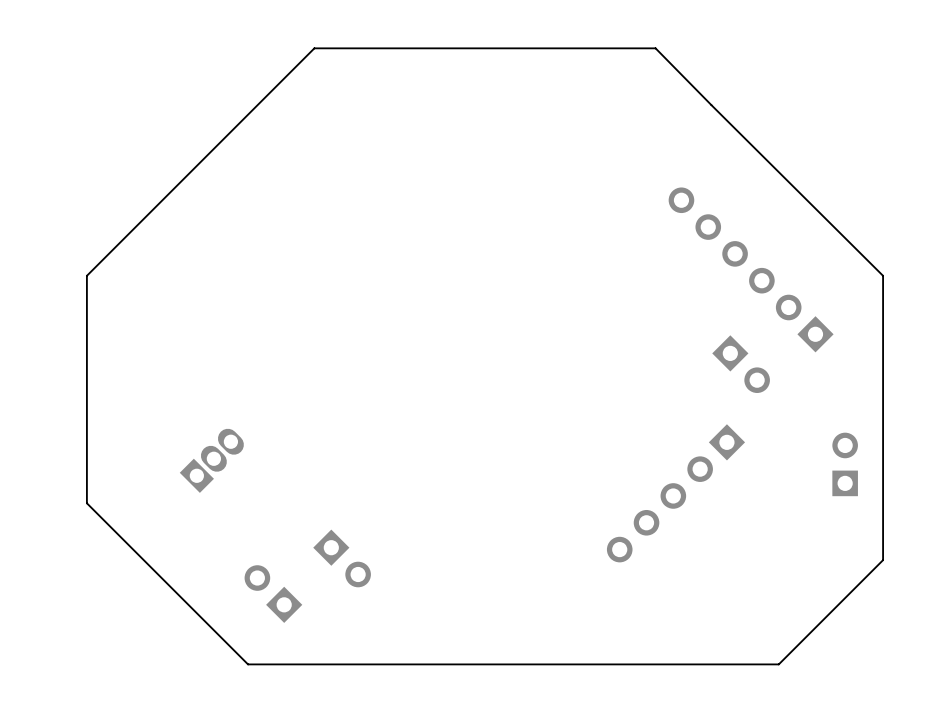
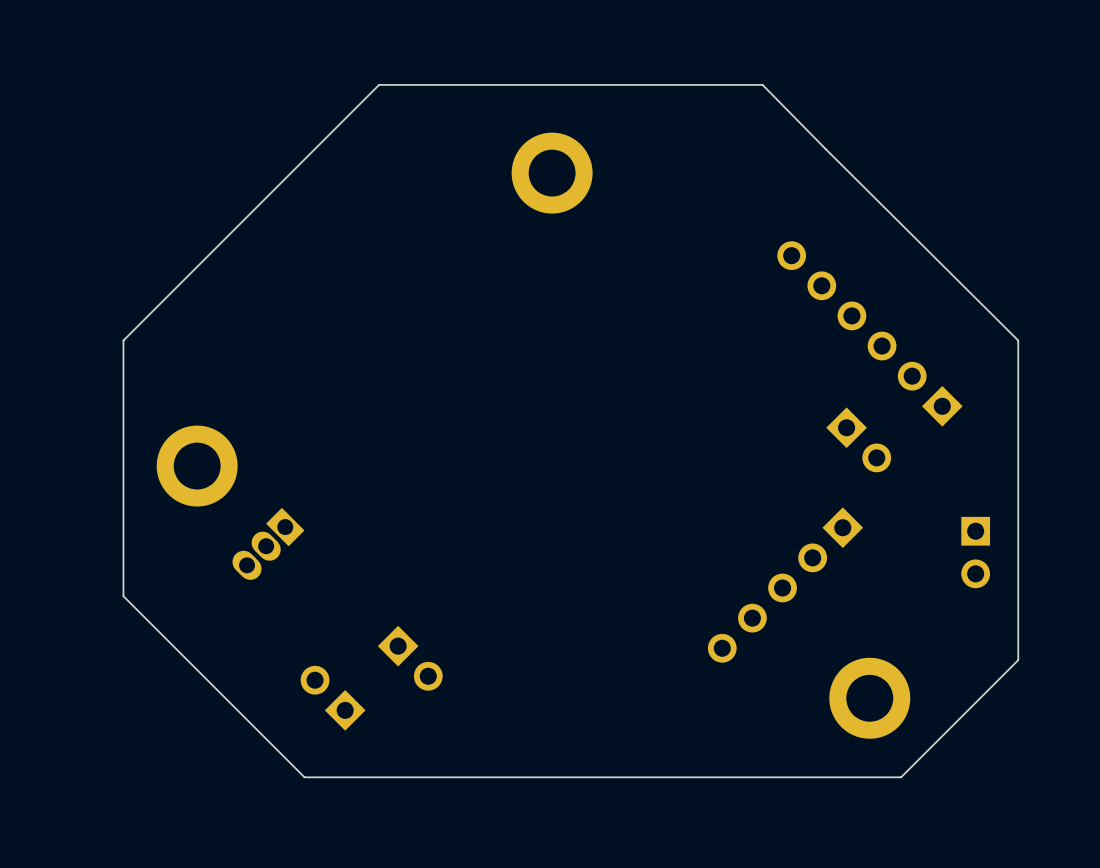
part: none -> (552, 173)
part: none -> (197, 466)
part rotation: 0° (211, 460) -> 180° (268, 543)
part rotation: 0° (845, 464) -> 180° (975, 552)
part: none -> (869, 698)

